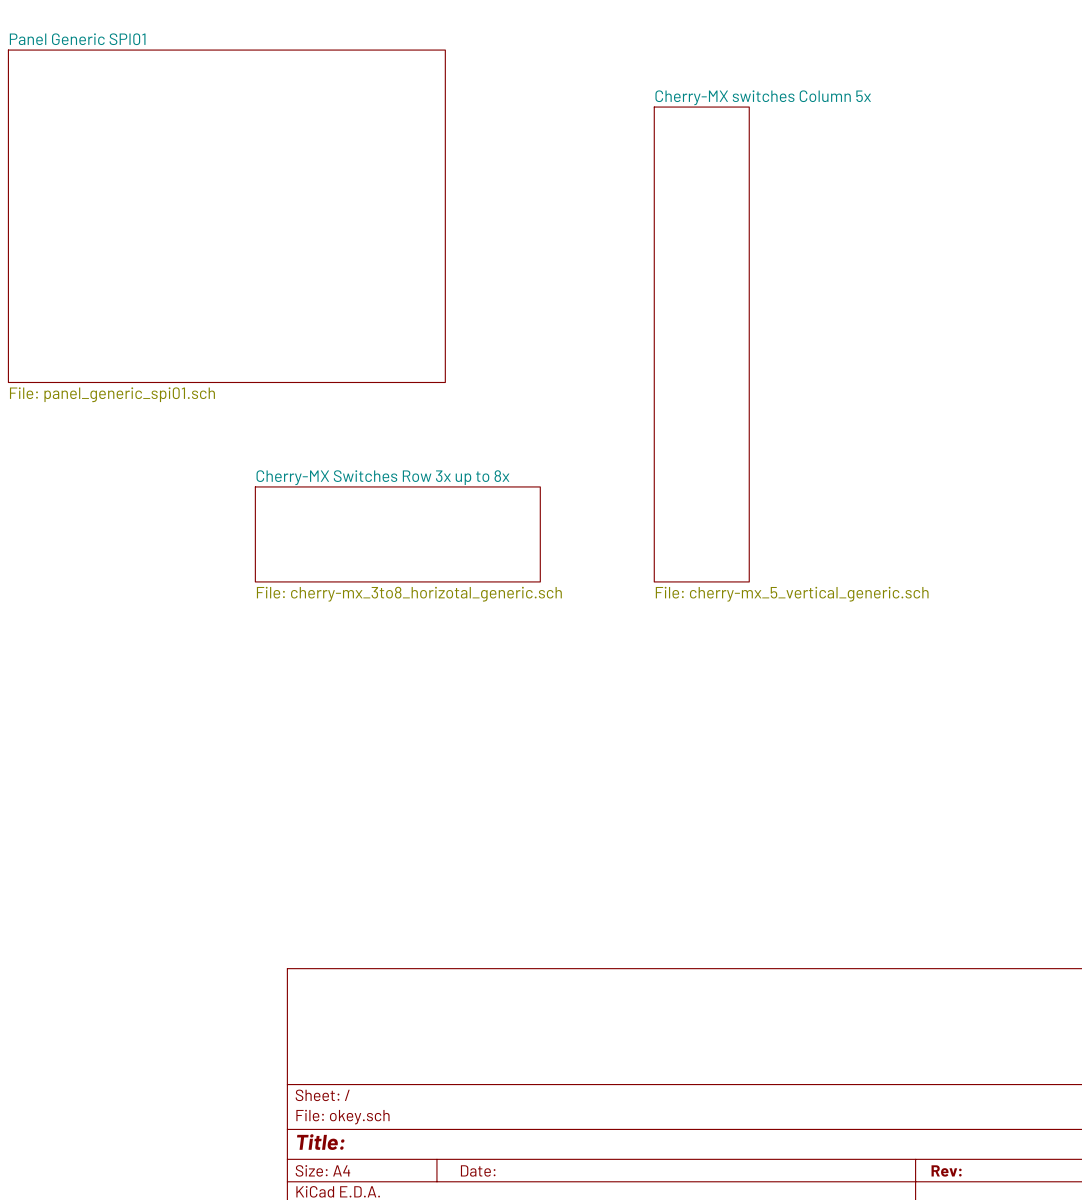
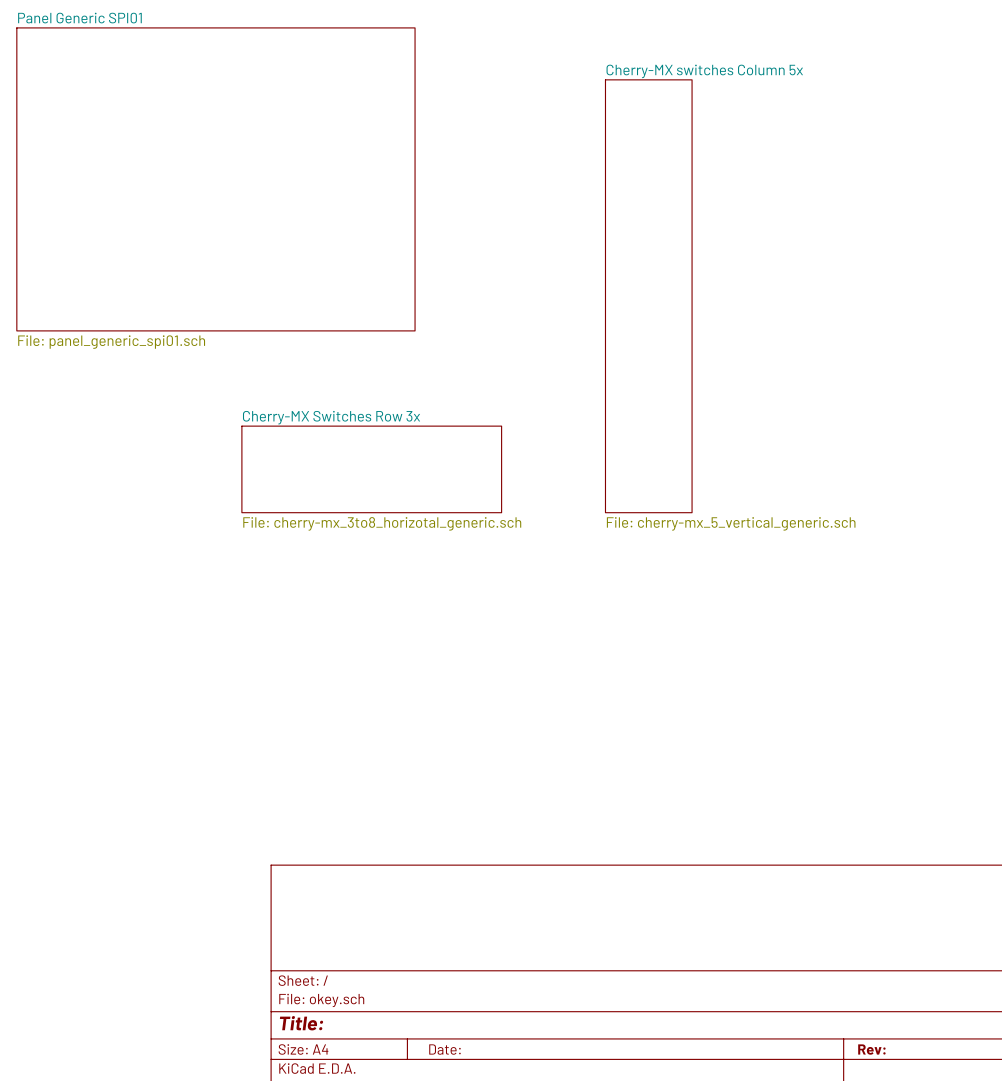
sheet Cherry-MX Switches Row 3x up to 8x name: Cherry-MX Switches Row 3x up to 8x (382, 477) -> Cherry-MX Switches Row 3x (331, 417)

